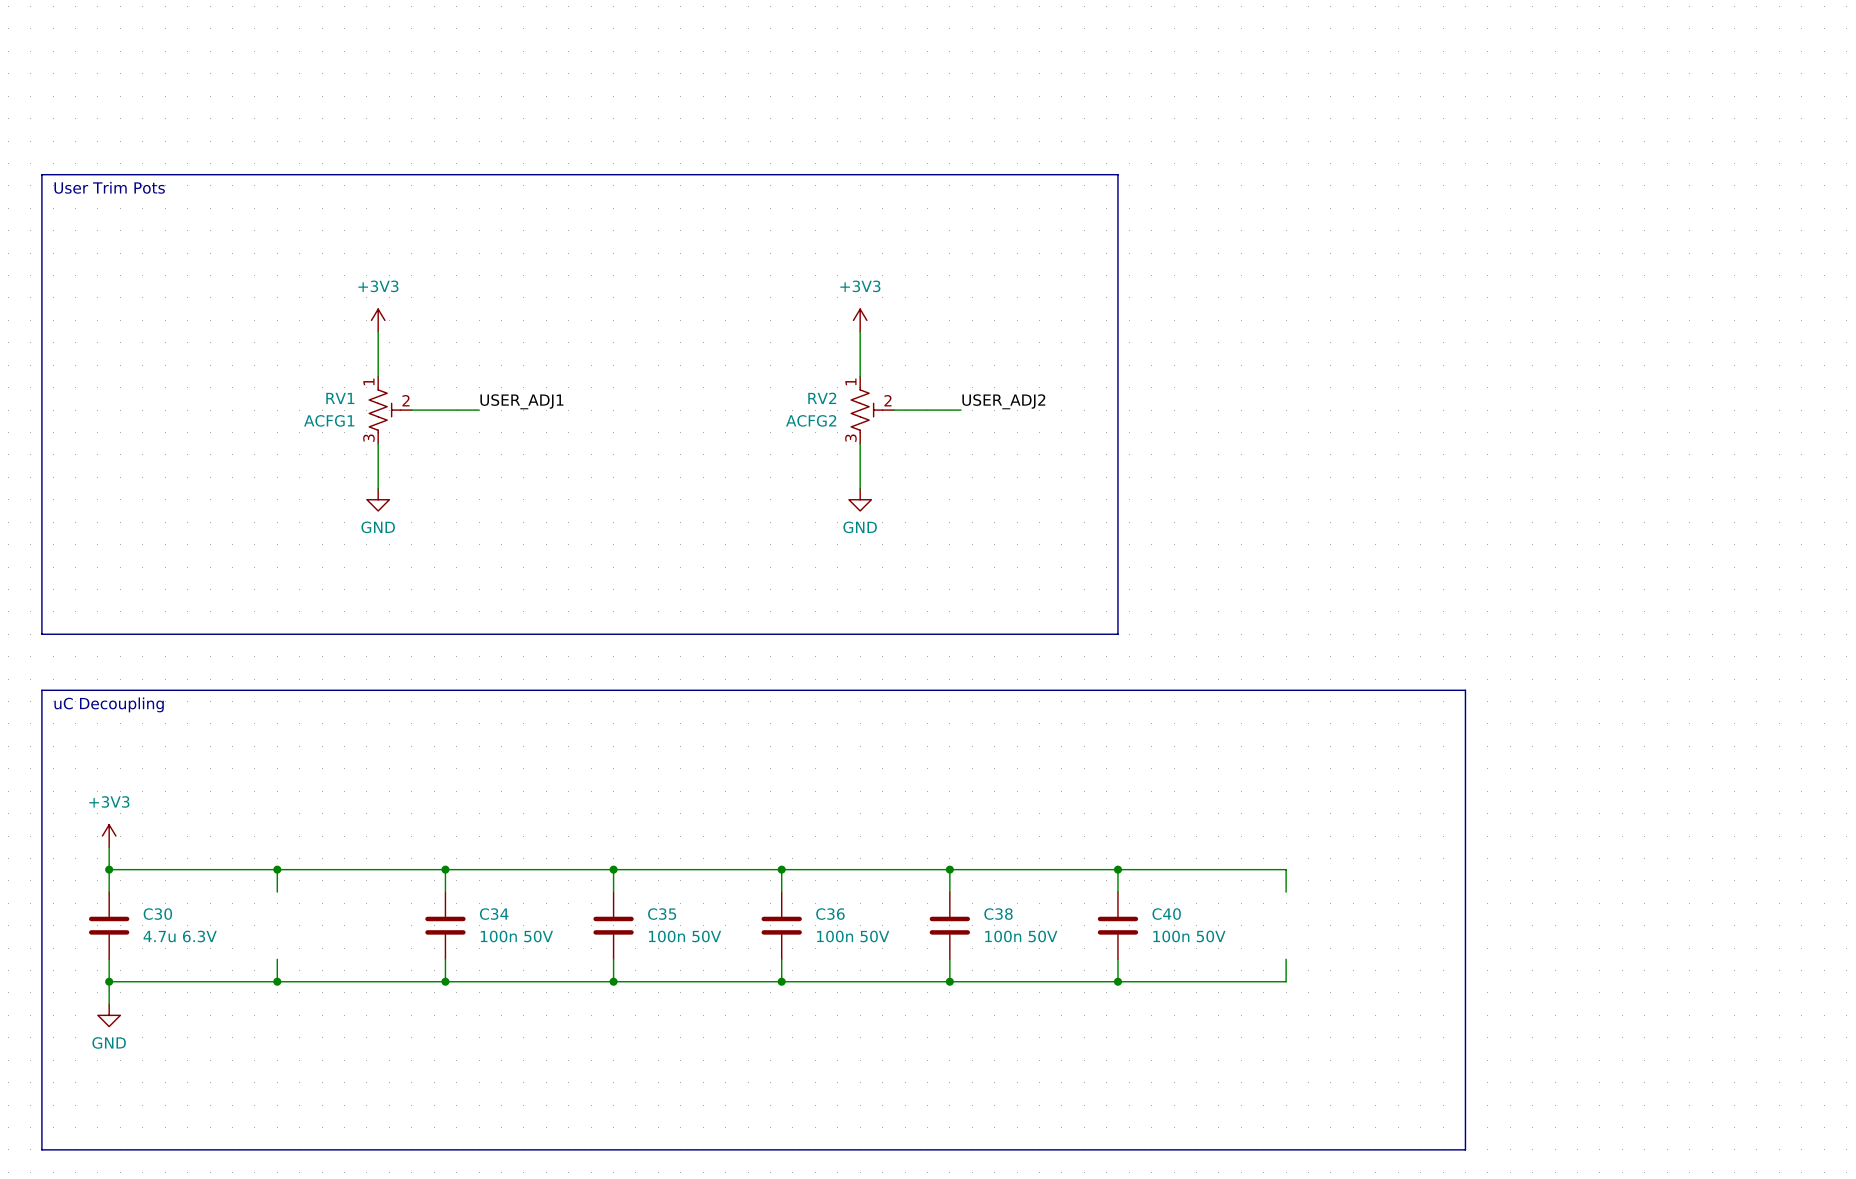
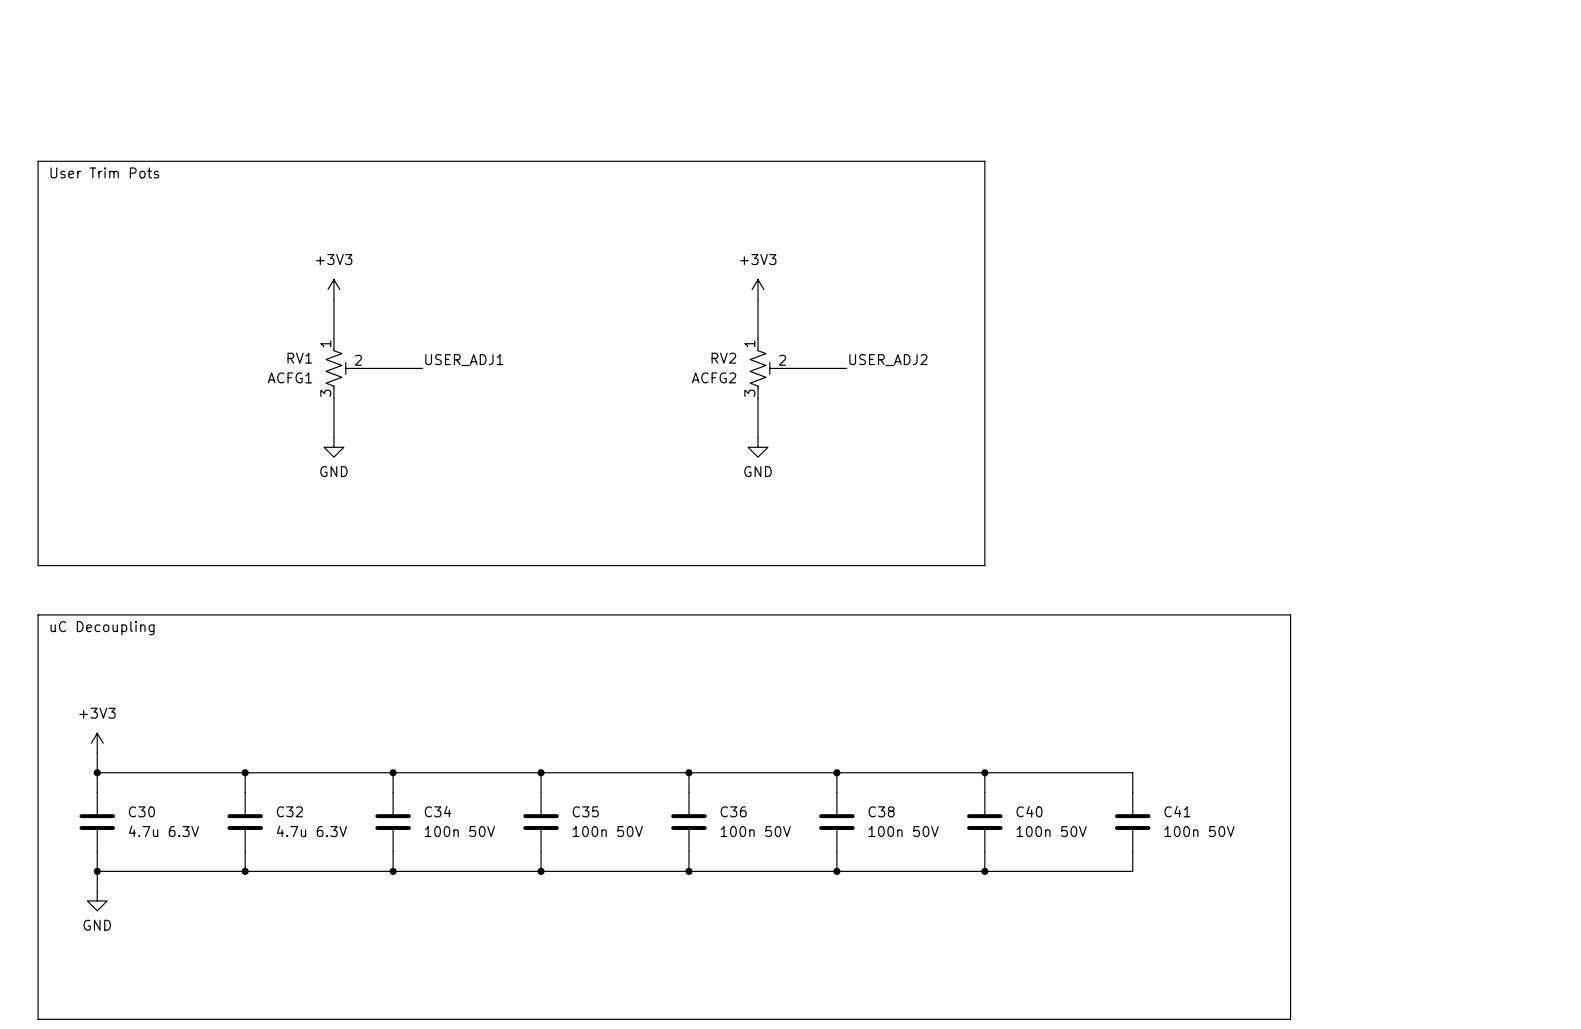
C32: none -> 4.7u 6.3V (245, 822)
C41: none -> 100n 50V (1132, 822)

